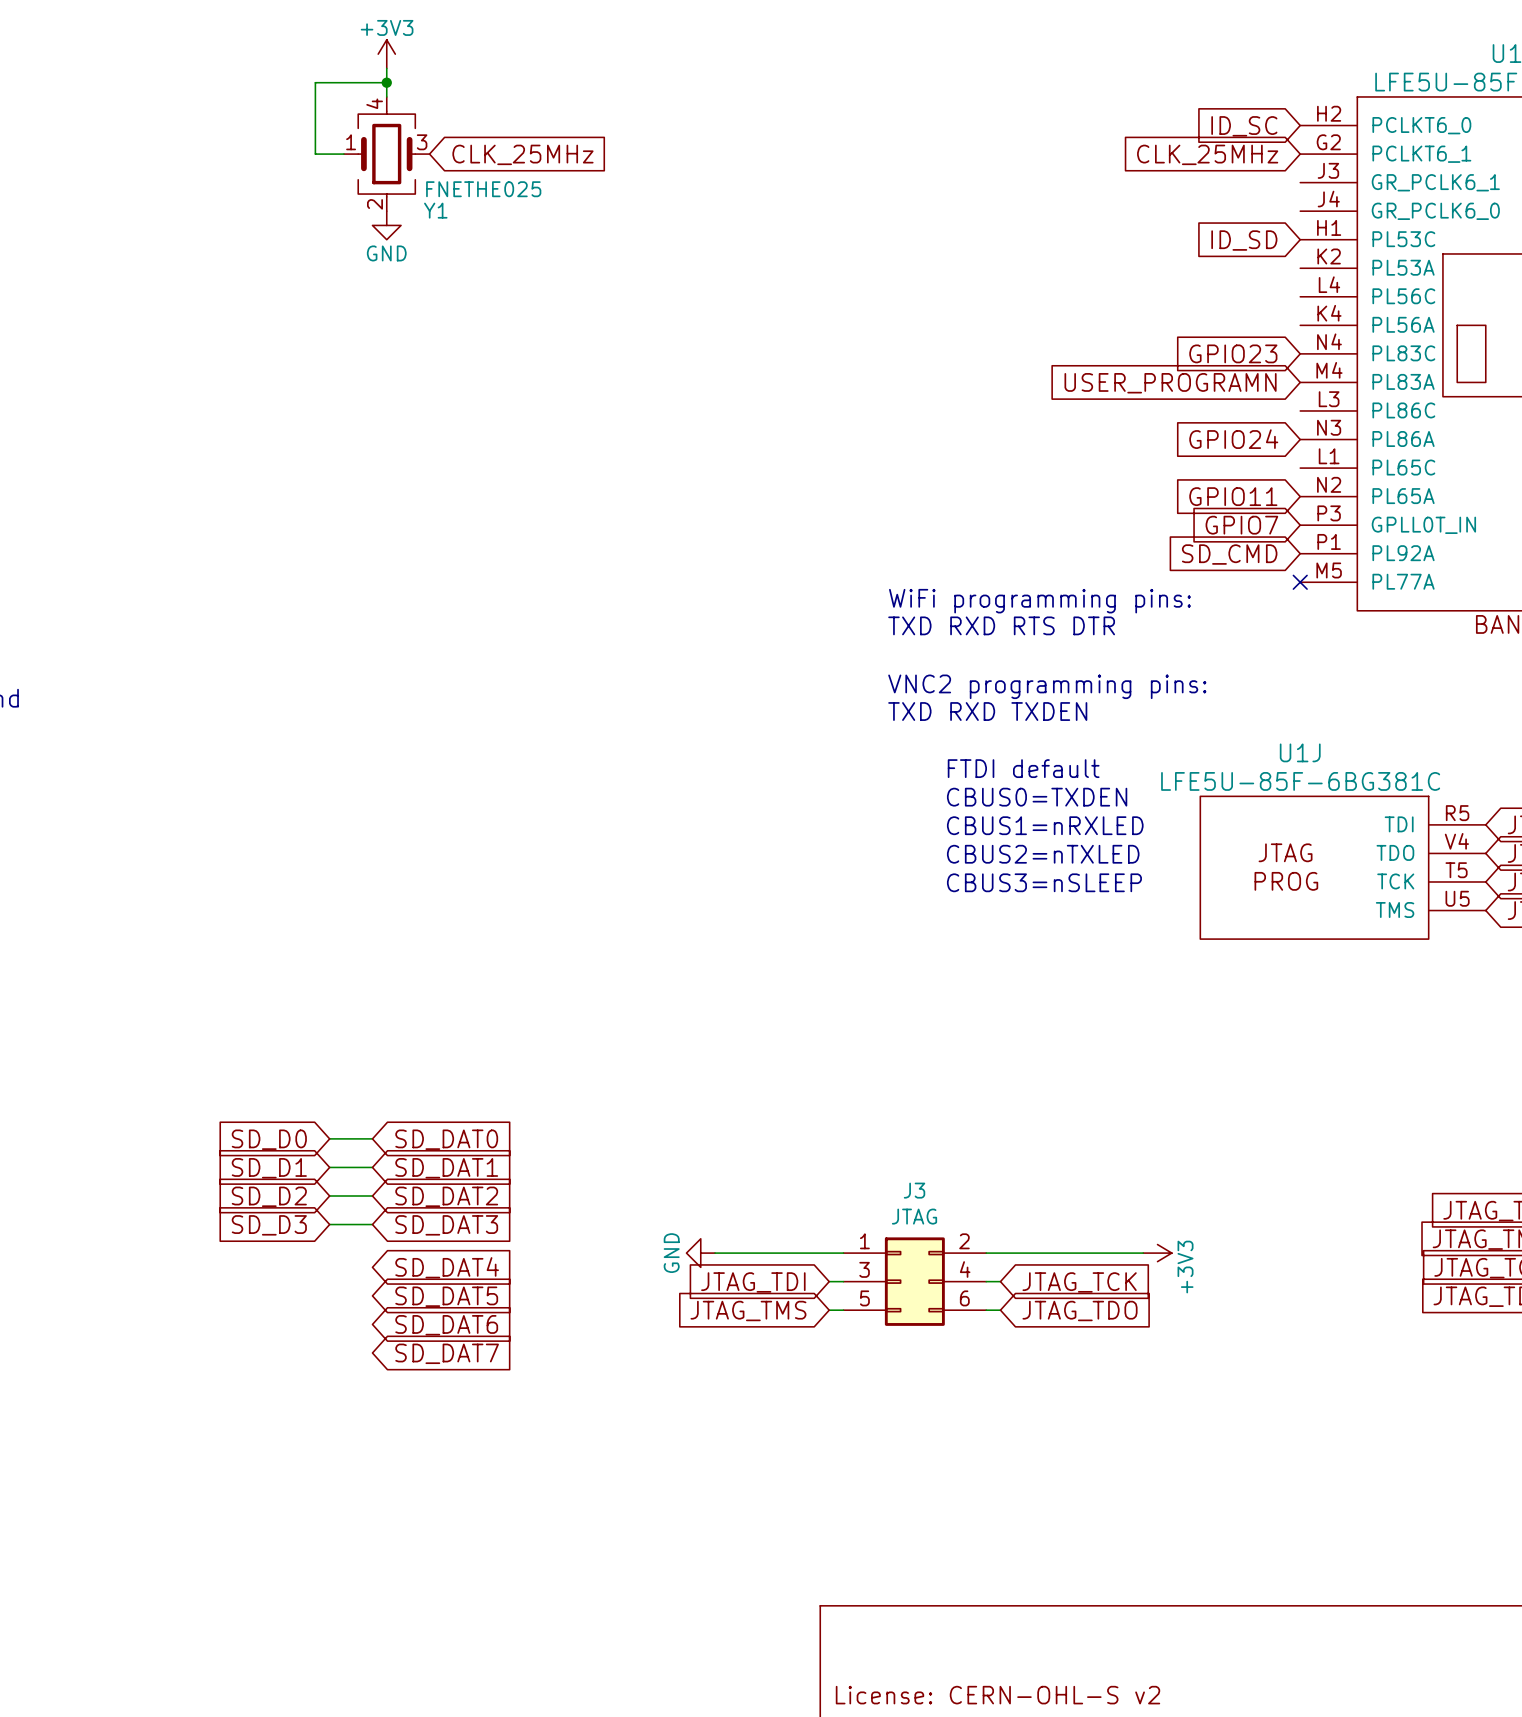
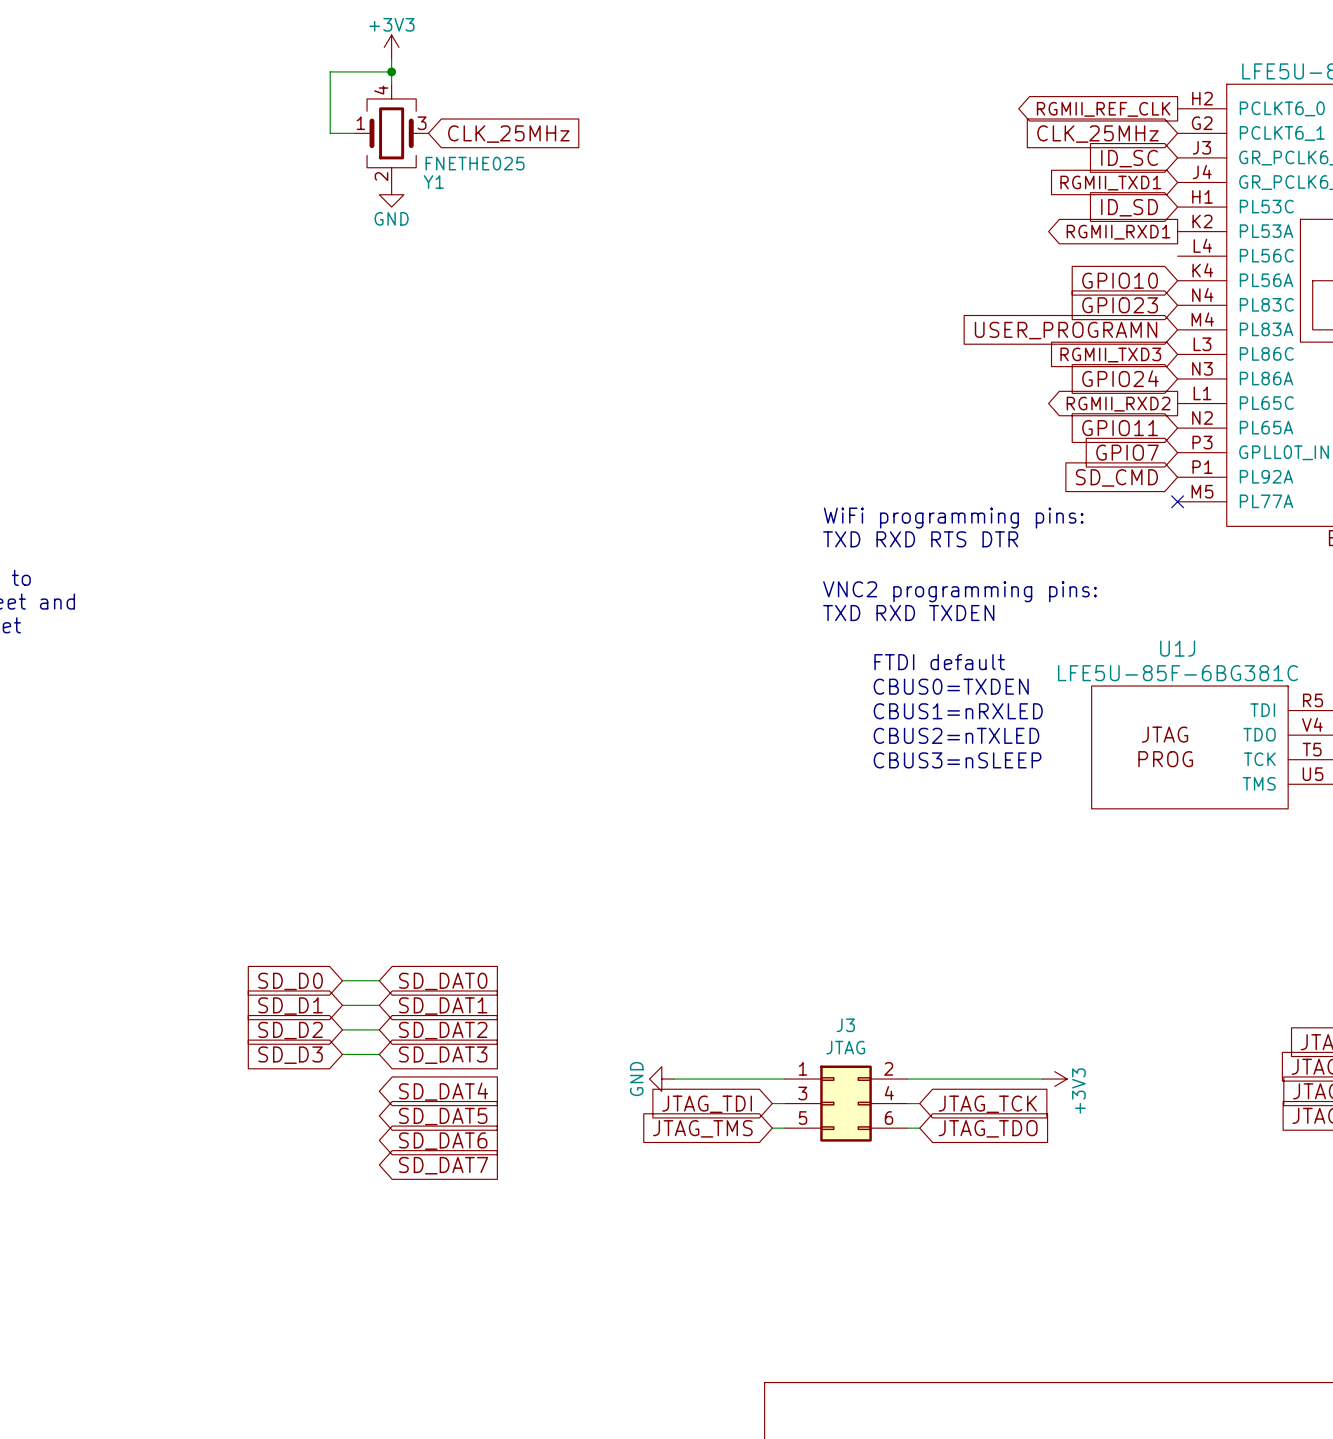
global label shape: input (1244, 126) -> output (1103, 109)
global label: ID_SC (1244, 126) -> RGMII_REF_CLK (1103, 109)
global label: none -> ID_SC (1129, 158)
global label: none -> RGMII_TXD1 (1110, 183)
global label: none -> RGMII_RXD1 (1118, 232)
global label: none -> GPIO10 (1120, 280)
global label: none -> RGMII_TXD3 (1110, 355)
global label: none -> RGMII_RXD2 (1118, 404)

